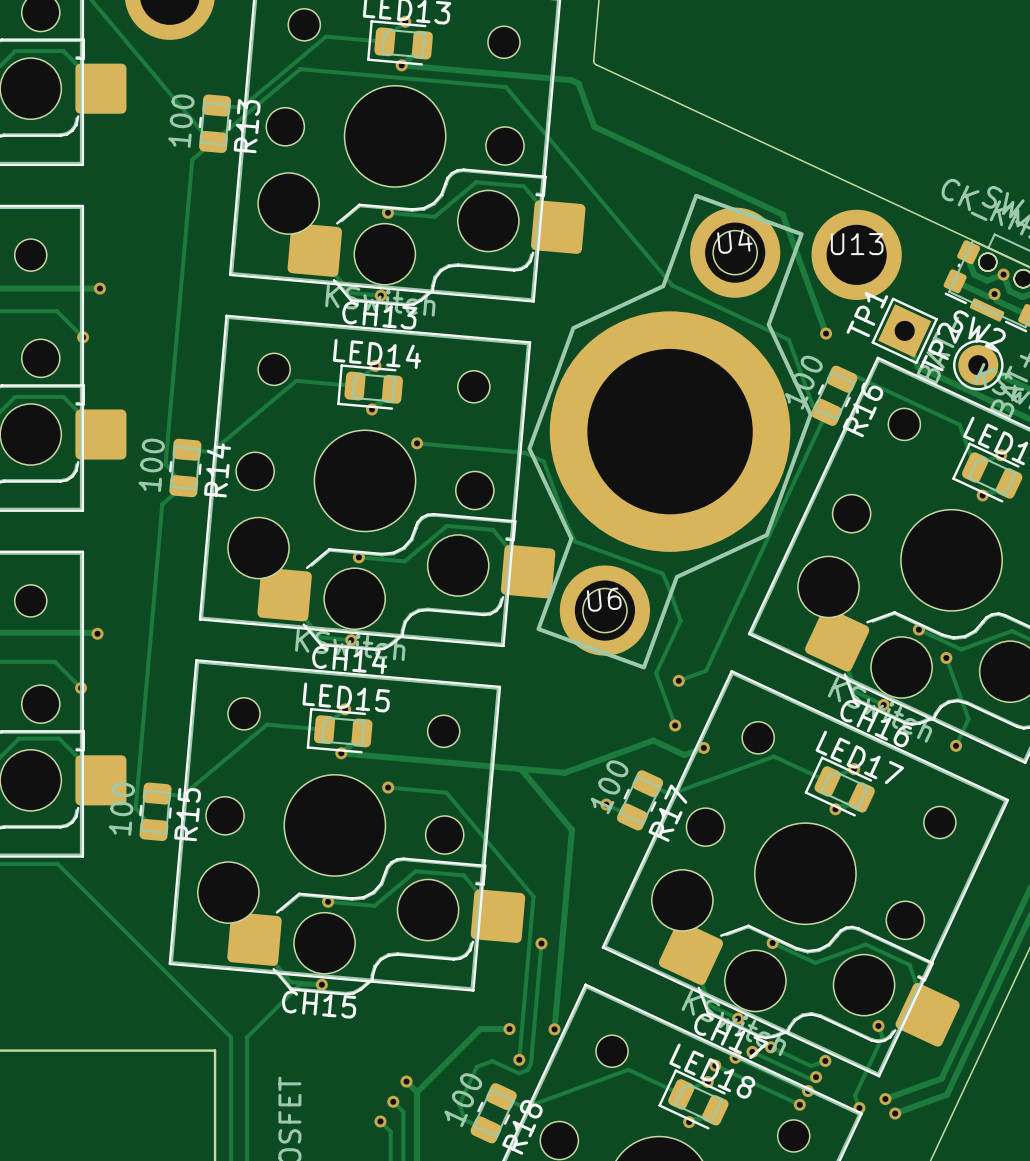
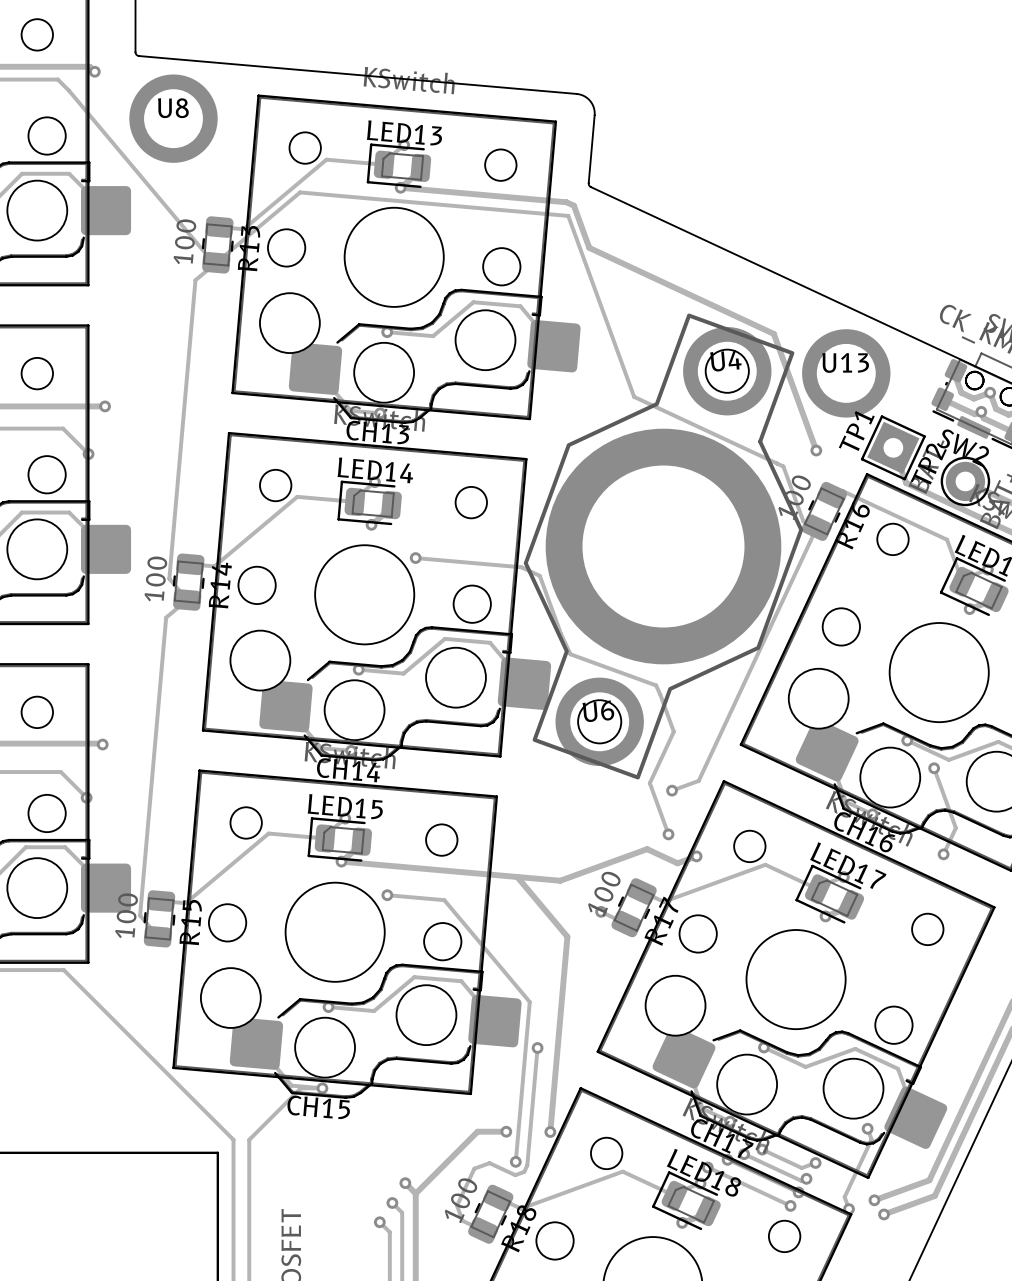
track: (299, 70) (506, 87) (672, 285) (788, 339) (792, 349) -> (300, 192) (568, 215) (634, 396) (783, 466)

